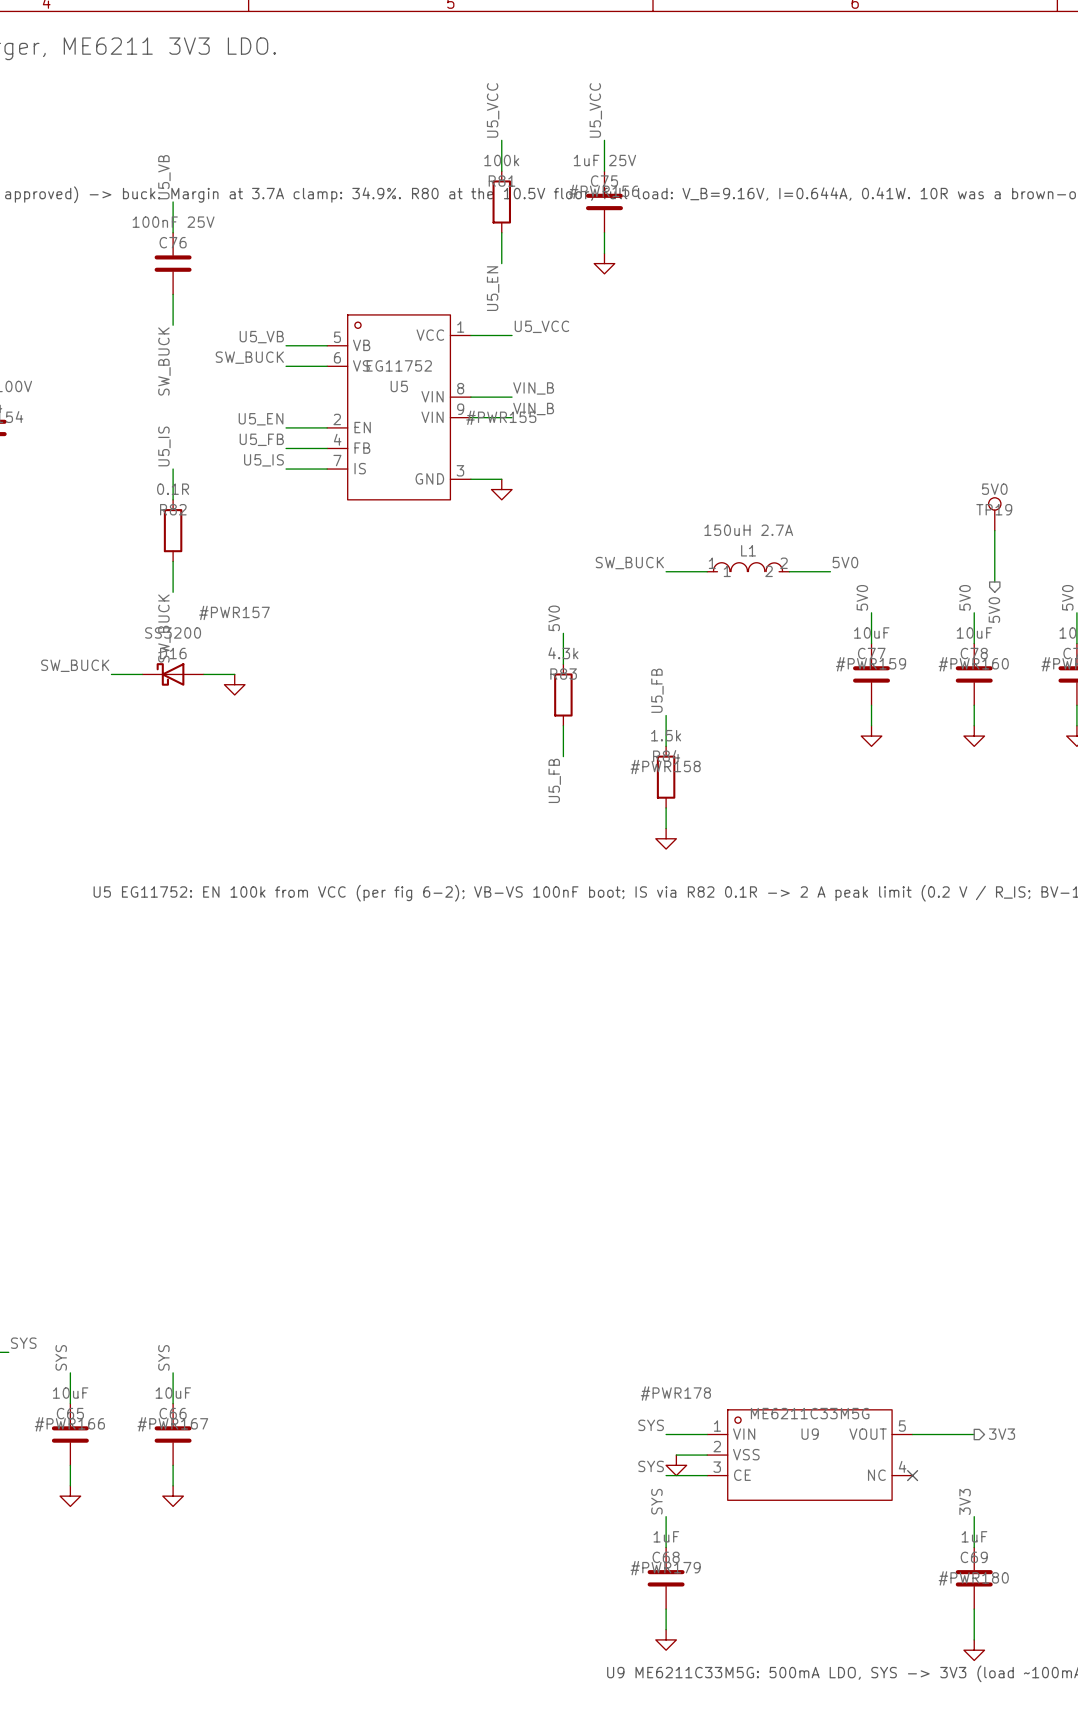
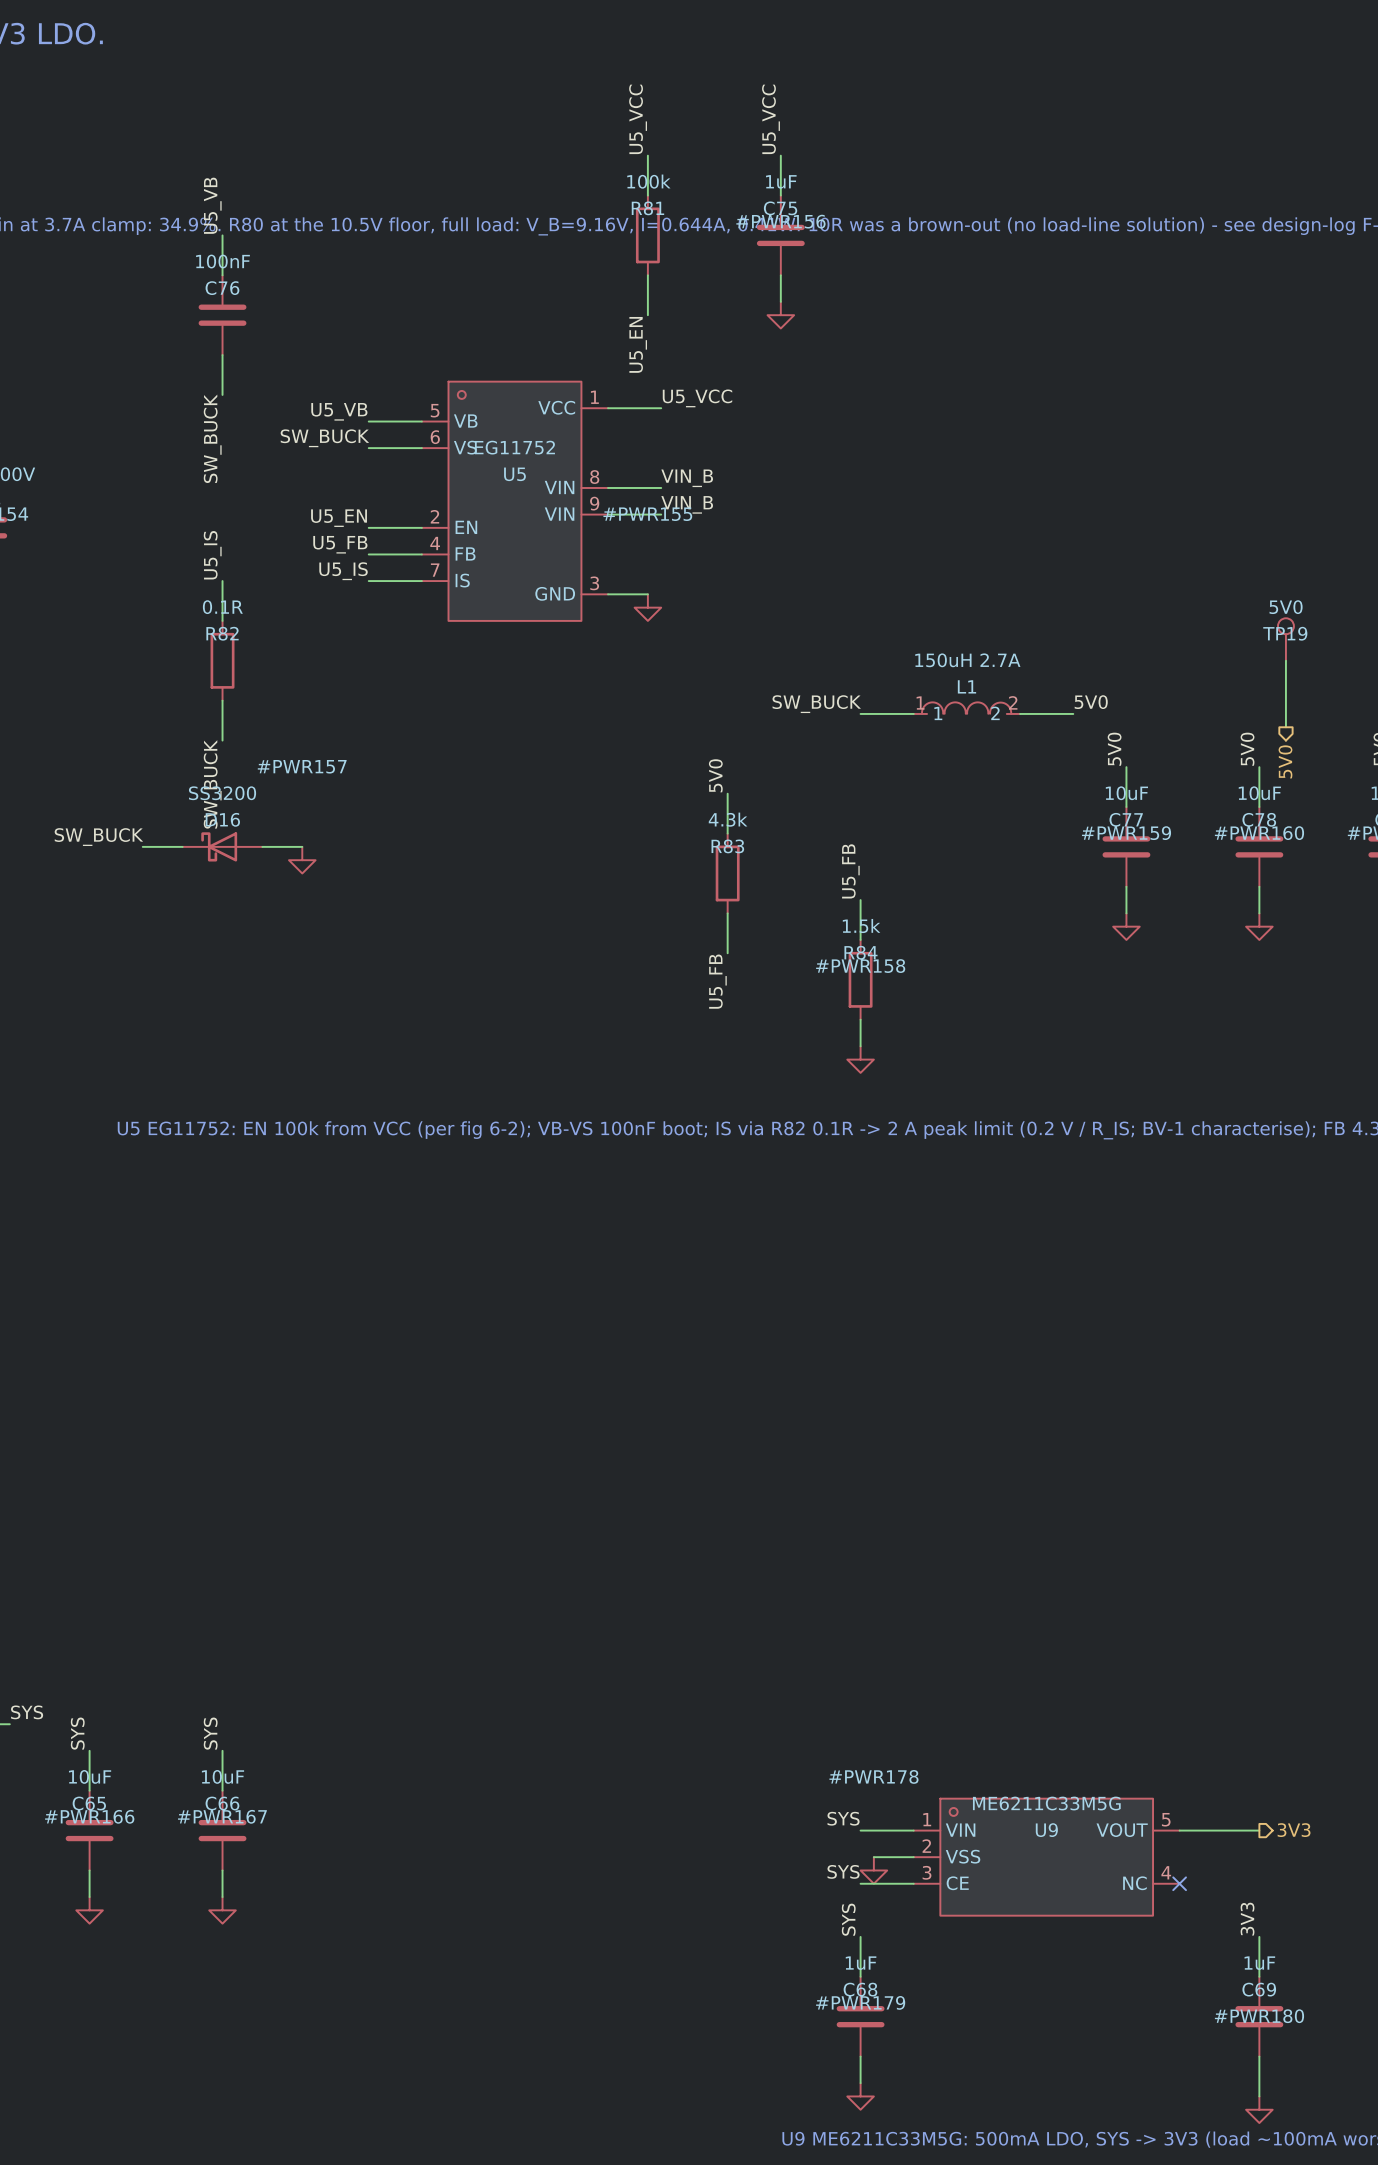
C75 value: 1uF 25V (604, 160) -> 1uF (781, 181)
C76 value: 100nF 25V (173, 222) -> 100nF (222, 261)

